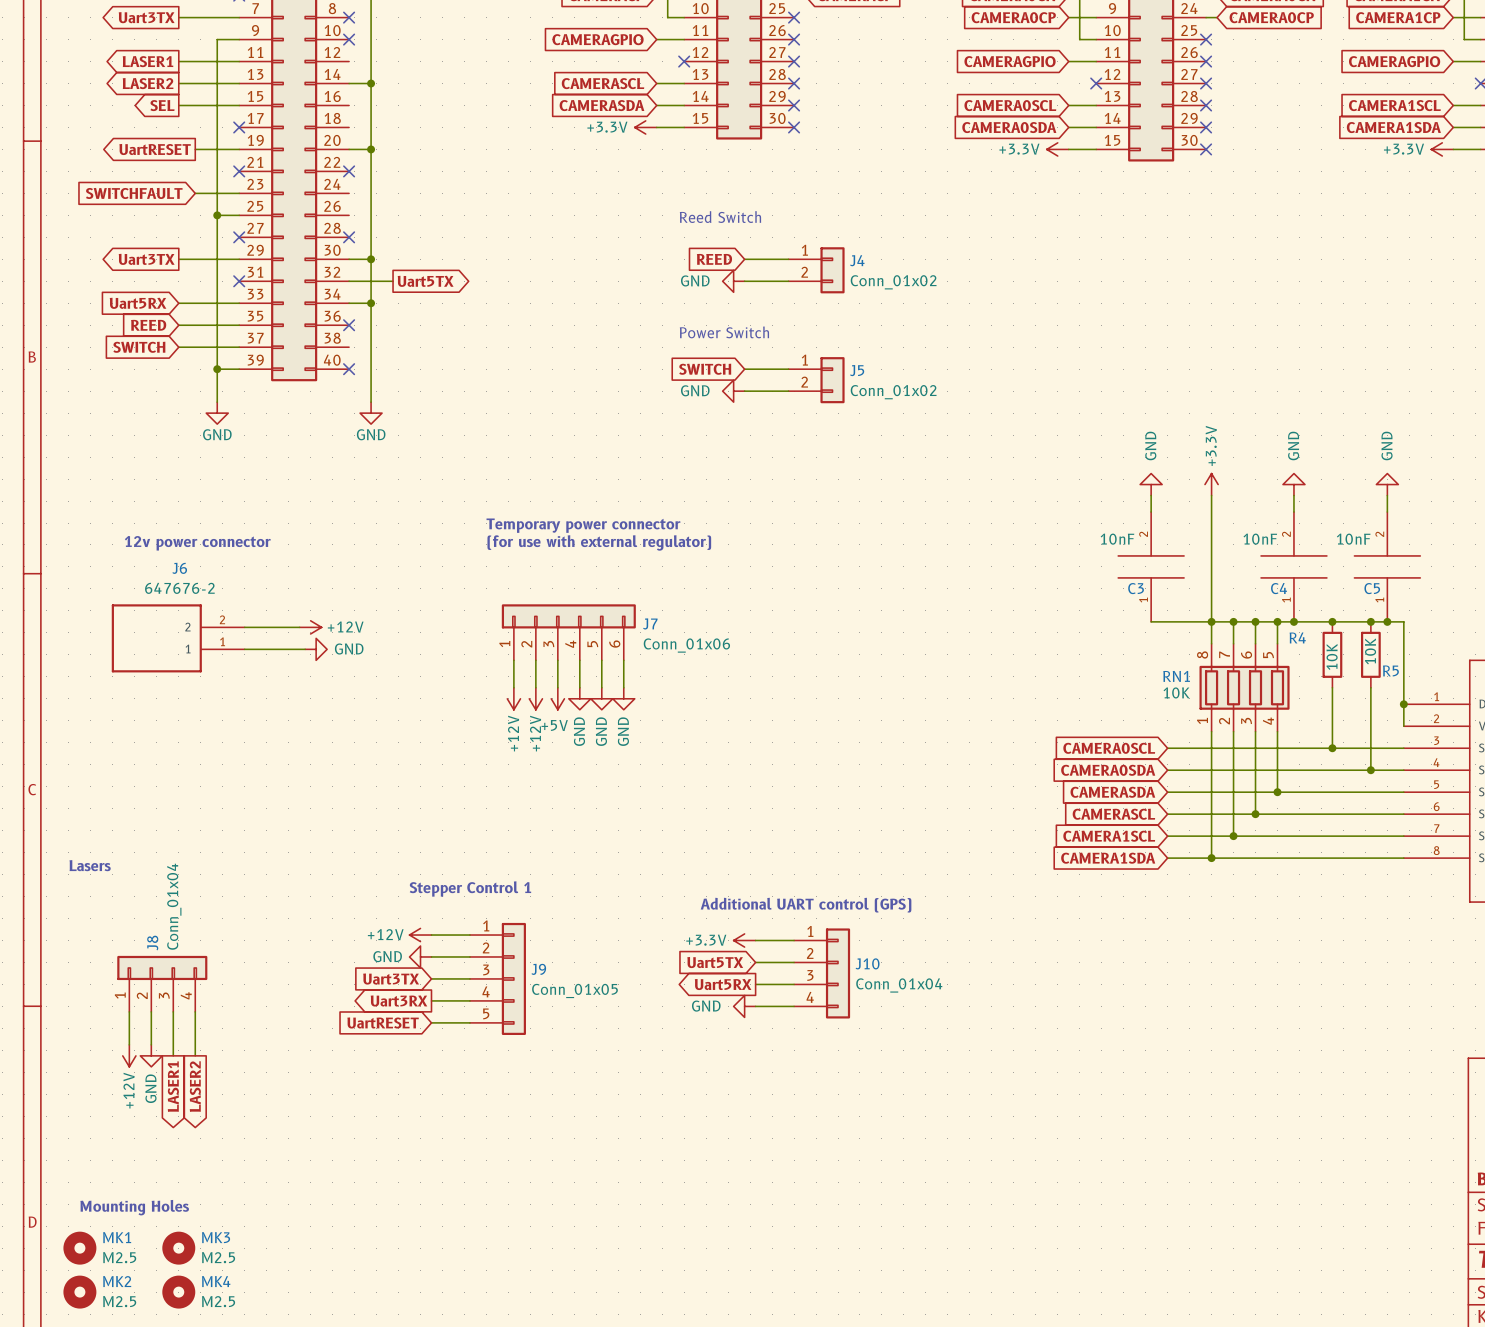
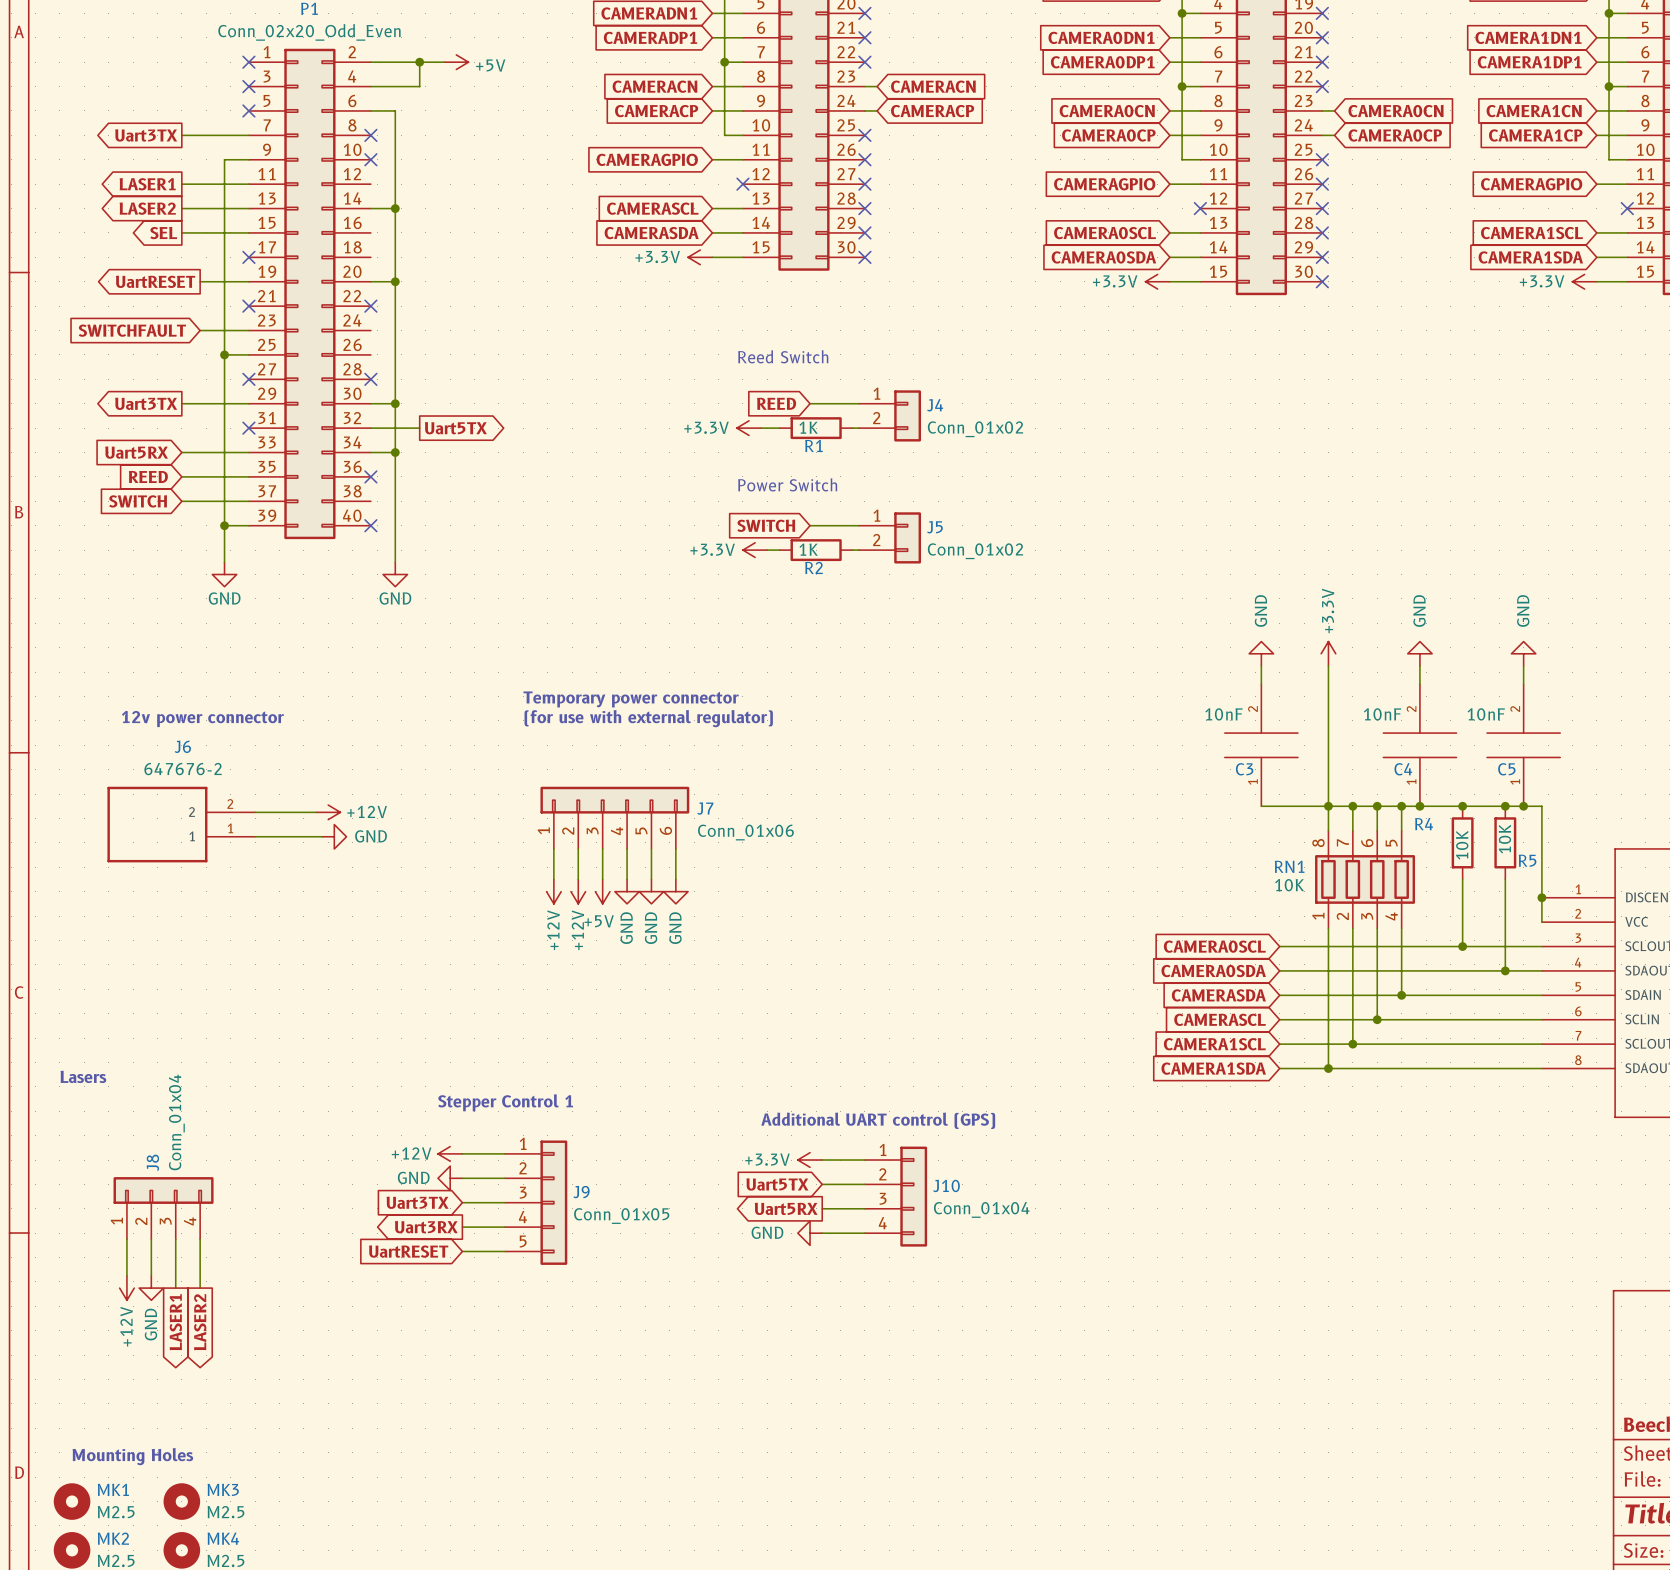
power symbol: none -> +3.3V (749, 428)
wire: none -> (761, 428) (779, 428)
power symbol: GND (733, 281) -> none
wire: (744, 281) (783, 281) -> none
R1: none -> 1K (816, 428)
power symbol: none -> +3.3V (755, 550)
wire: none -> (767, 550) (779, 550)
power symbol: GND (733, 391) -> none
wire: (744, 391) (783, 391) -> none
R2: none -> 1K (816, 550)

